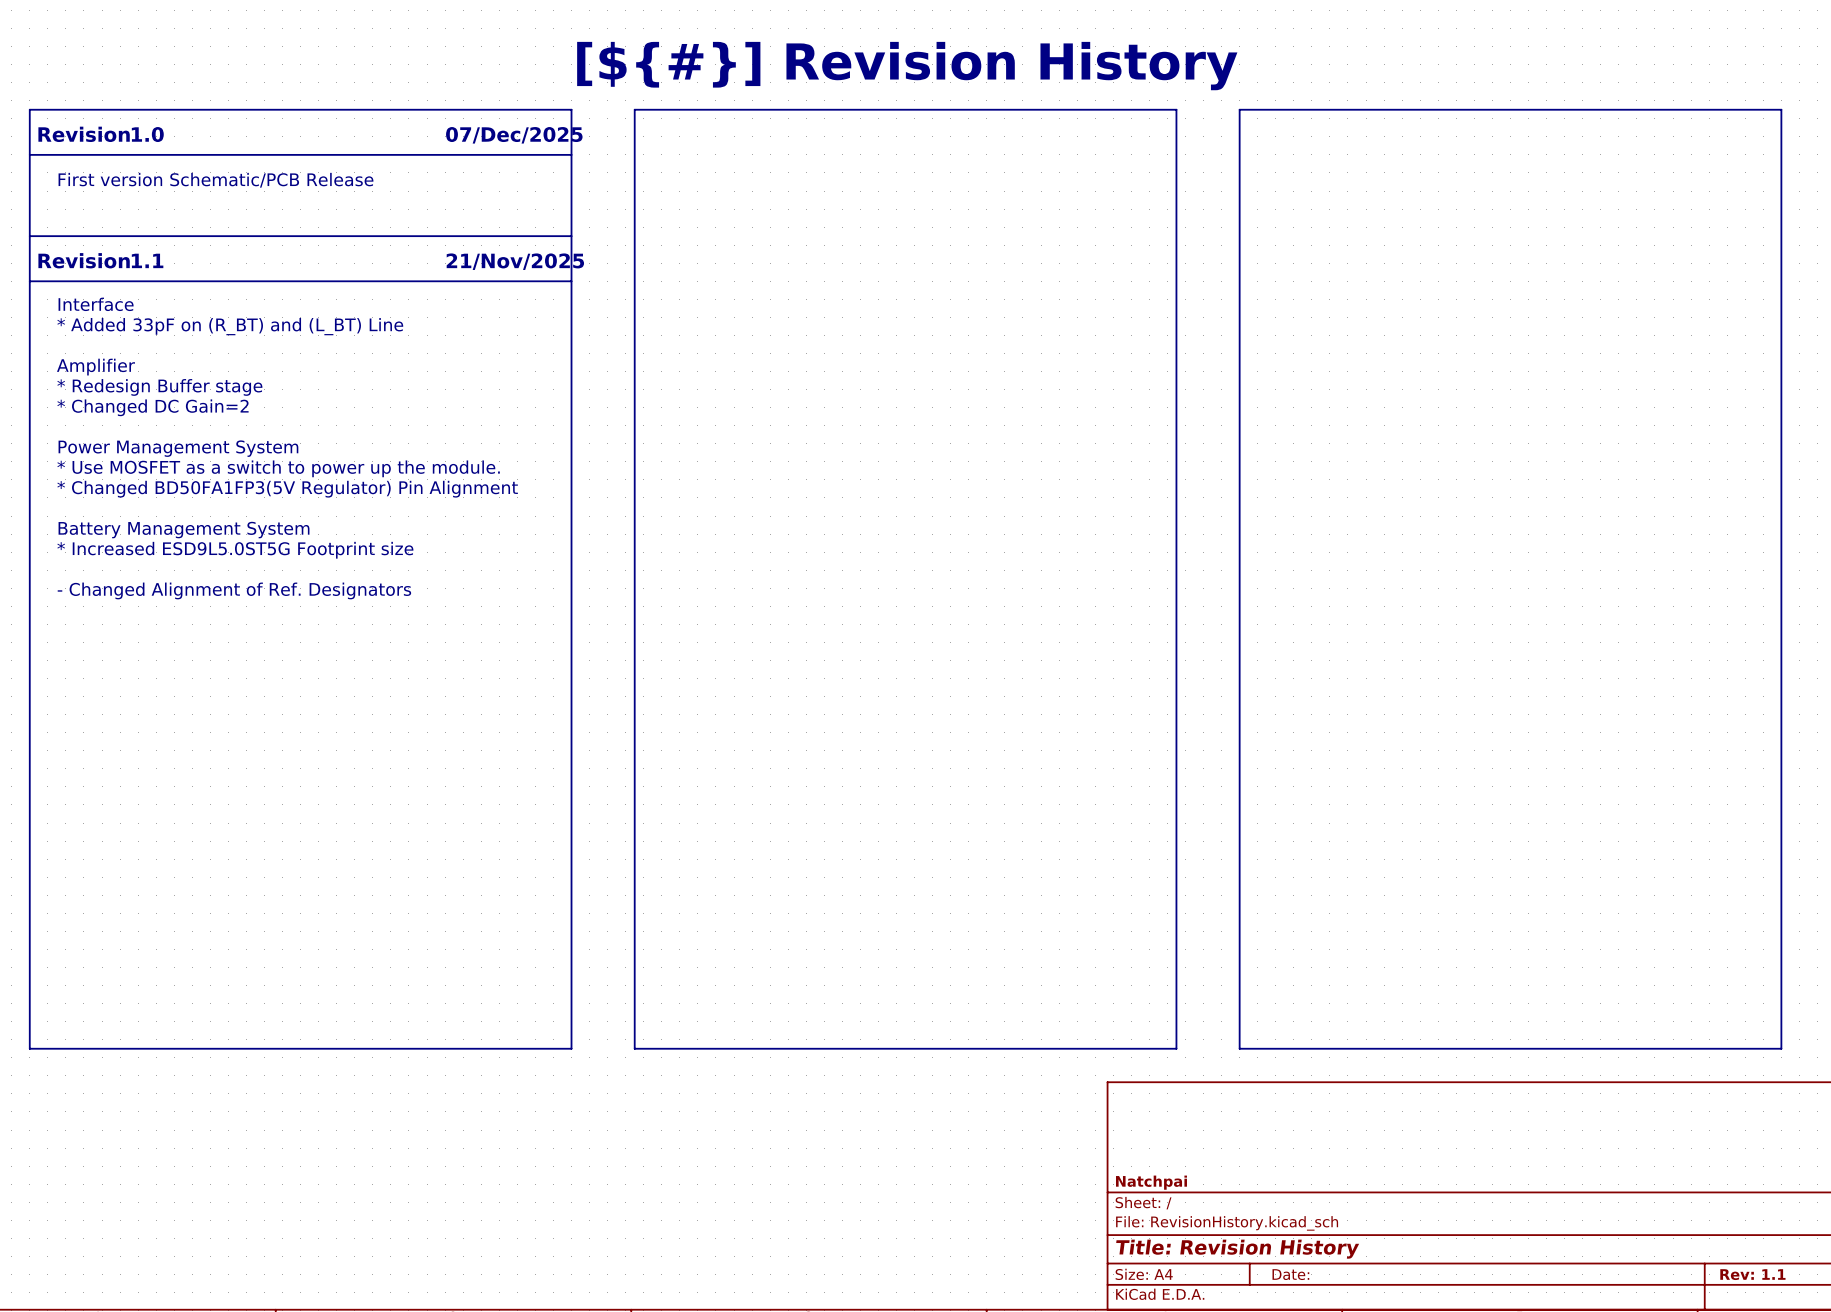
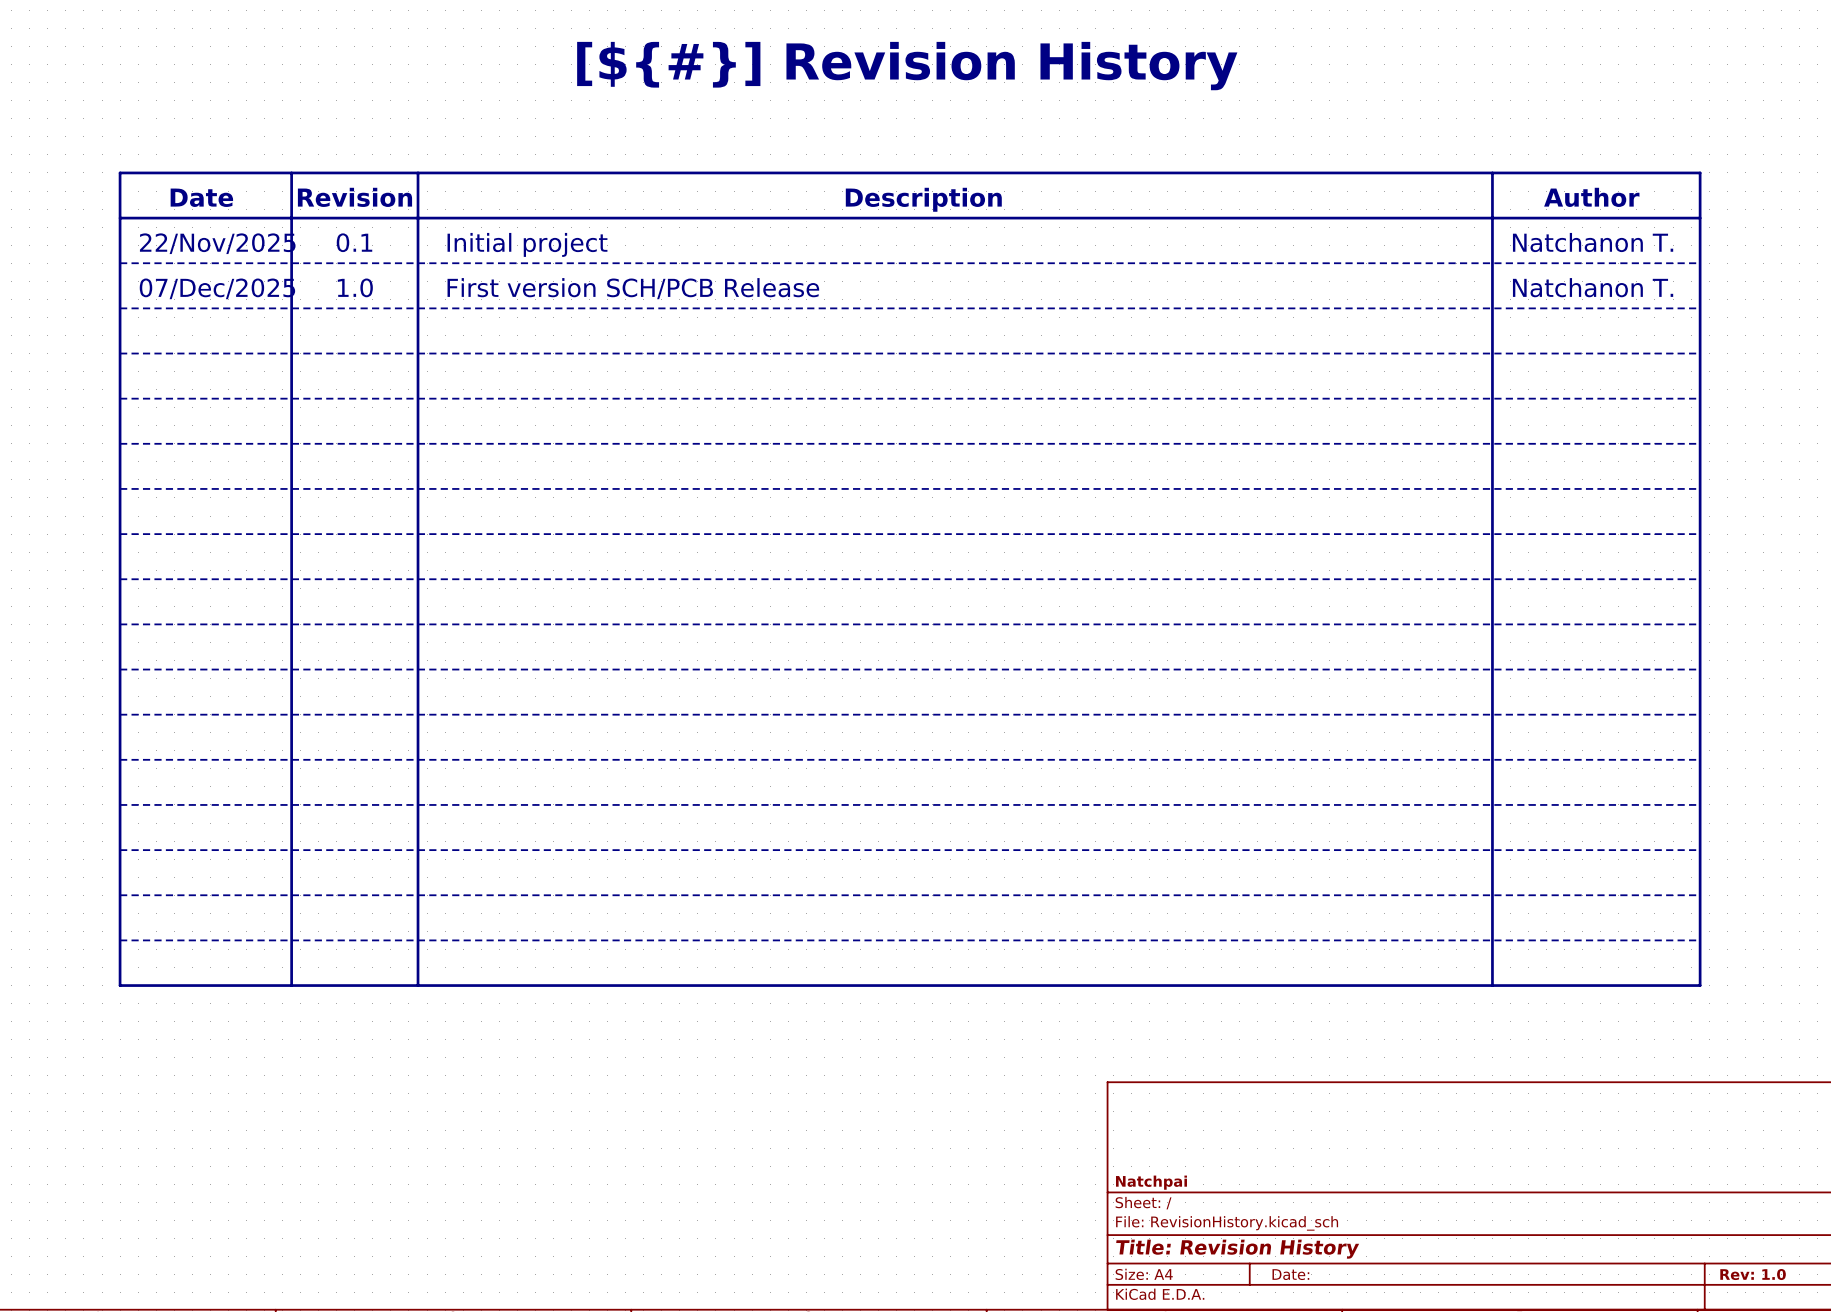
line: (29, 109) (571, 109) (571, 1048) (29, 1048) (29, 109) -> none
line: (634, 109) (634, 1048) (1176, 1048) (1176, 109) (634, 109) -> none
line: (1239, 109) (1781, 109) (1781, 1048) (1239, 1048) (1239, 109) -> none
text: Revision (84, 134) -> none
text: 1.0 (147, 134) -> none
text: 07/Dec/2025 (514, 135) -> none
line: (29, 154) (571, 154) -> none
line: none -> (120, 172) (1700, 172) (1700, 985) (120, 985) (120, 172)
line: none -> (291, 172) (291, 985)
line: none -> (418, 172) (418, 985)
line: none -> (1492, 172) (1492, 985)
text: First version Schematic/PCB Release (215, 180) -> none
text: none -> Date (201, 197)
text: none -> Revision (354, 197)
text: none -> Author (1591, 197)
text: none -> Description (923, 199)
line: none -> (120, 218) (1700, 218)
line: (29, 236) (571, 236) -> none
text: none -> 0.1 (354, 242)
text: none -> Natchanon T. (1593, 242)
text: none -> 22/Nov/2025 (217, 243)
text: none -> Initial project (527, 244)
text: Revision (84, 260) -> none
text: 1.1 (147, 260) -> none
text: 21/Nov/2025 (515, 261) -> none
line: none -> (120, 263) (1700, 263)
line: (29, 281) (571, 281) -> none
text: none -> 1.0 (355, 287)
text: none -> Natchanon T. (1593, 287)
text: none -> 07/Dec/2025 (217, 288)
text: none -> First version SCH/PCB Release (633, 288)
text: Interface (96, 304) -> none
line: none -> (120, 308) (1700, 308)
text: * Added 33pF on (R_BT) and (L_BT) Line (230, 326) -> none
line: none -> (120, 353) (1700, 353)
text: Amplifier (95, 367) -> none
text: * Redesign Buffer stage (159, 387) -> none
line: none -> (120, 398) (1700, 398)
text: * Changed DC Gain=2 (152, 407) -> none
line: none -> (120, 443) (1700, 443)
text: Power Management System (178, 448) -> none
text: * Use MOSFET as a switch to power up the module. (278, 468) -> none
line: none -> (120, 488) (1700, 488)
text: * Changed BD50FA1FP3(5V Regulator) Pin Alignment (287, 489) -> none
text: Battery Management System (184, 530) -> none
line: none -> (120, 534) (1700, 534)
text: * Increased ESD9L5.0ST5G Footprint size (235, 550) -> none
line: none -> (120, 579) (1700, 579)
text: - Changed Alignment of Ref. Designators (234, 590) -> none
line: none -> (120, 624) (1700, 624)
line: none -> (120, 669) (1700, 669)
line: none -> (120, 714) (1700, 714)
line: none -> (120, 759) (1700, 759)
line: none -> (120, 804) (1700, 804)
line: none -> (120, 850) (1700, 850)
line: none -> (120, 895) (1700, 895)
line: none -> (120, 940) (1700, 940)
title block: Rev: 1.1 (1752, 1274) -> Rev: 1.0 (1753, 1274)

